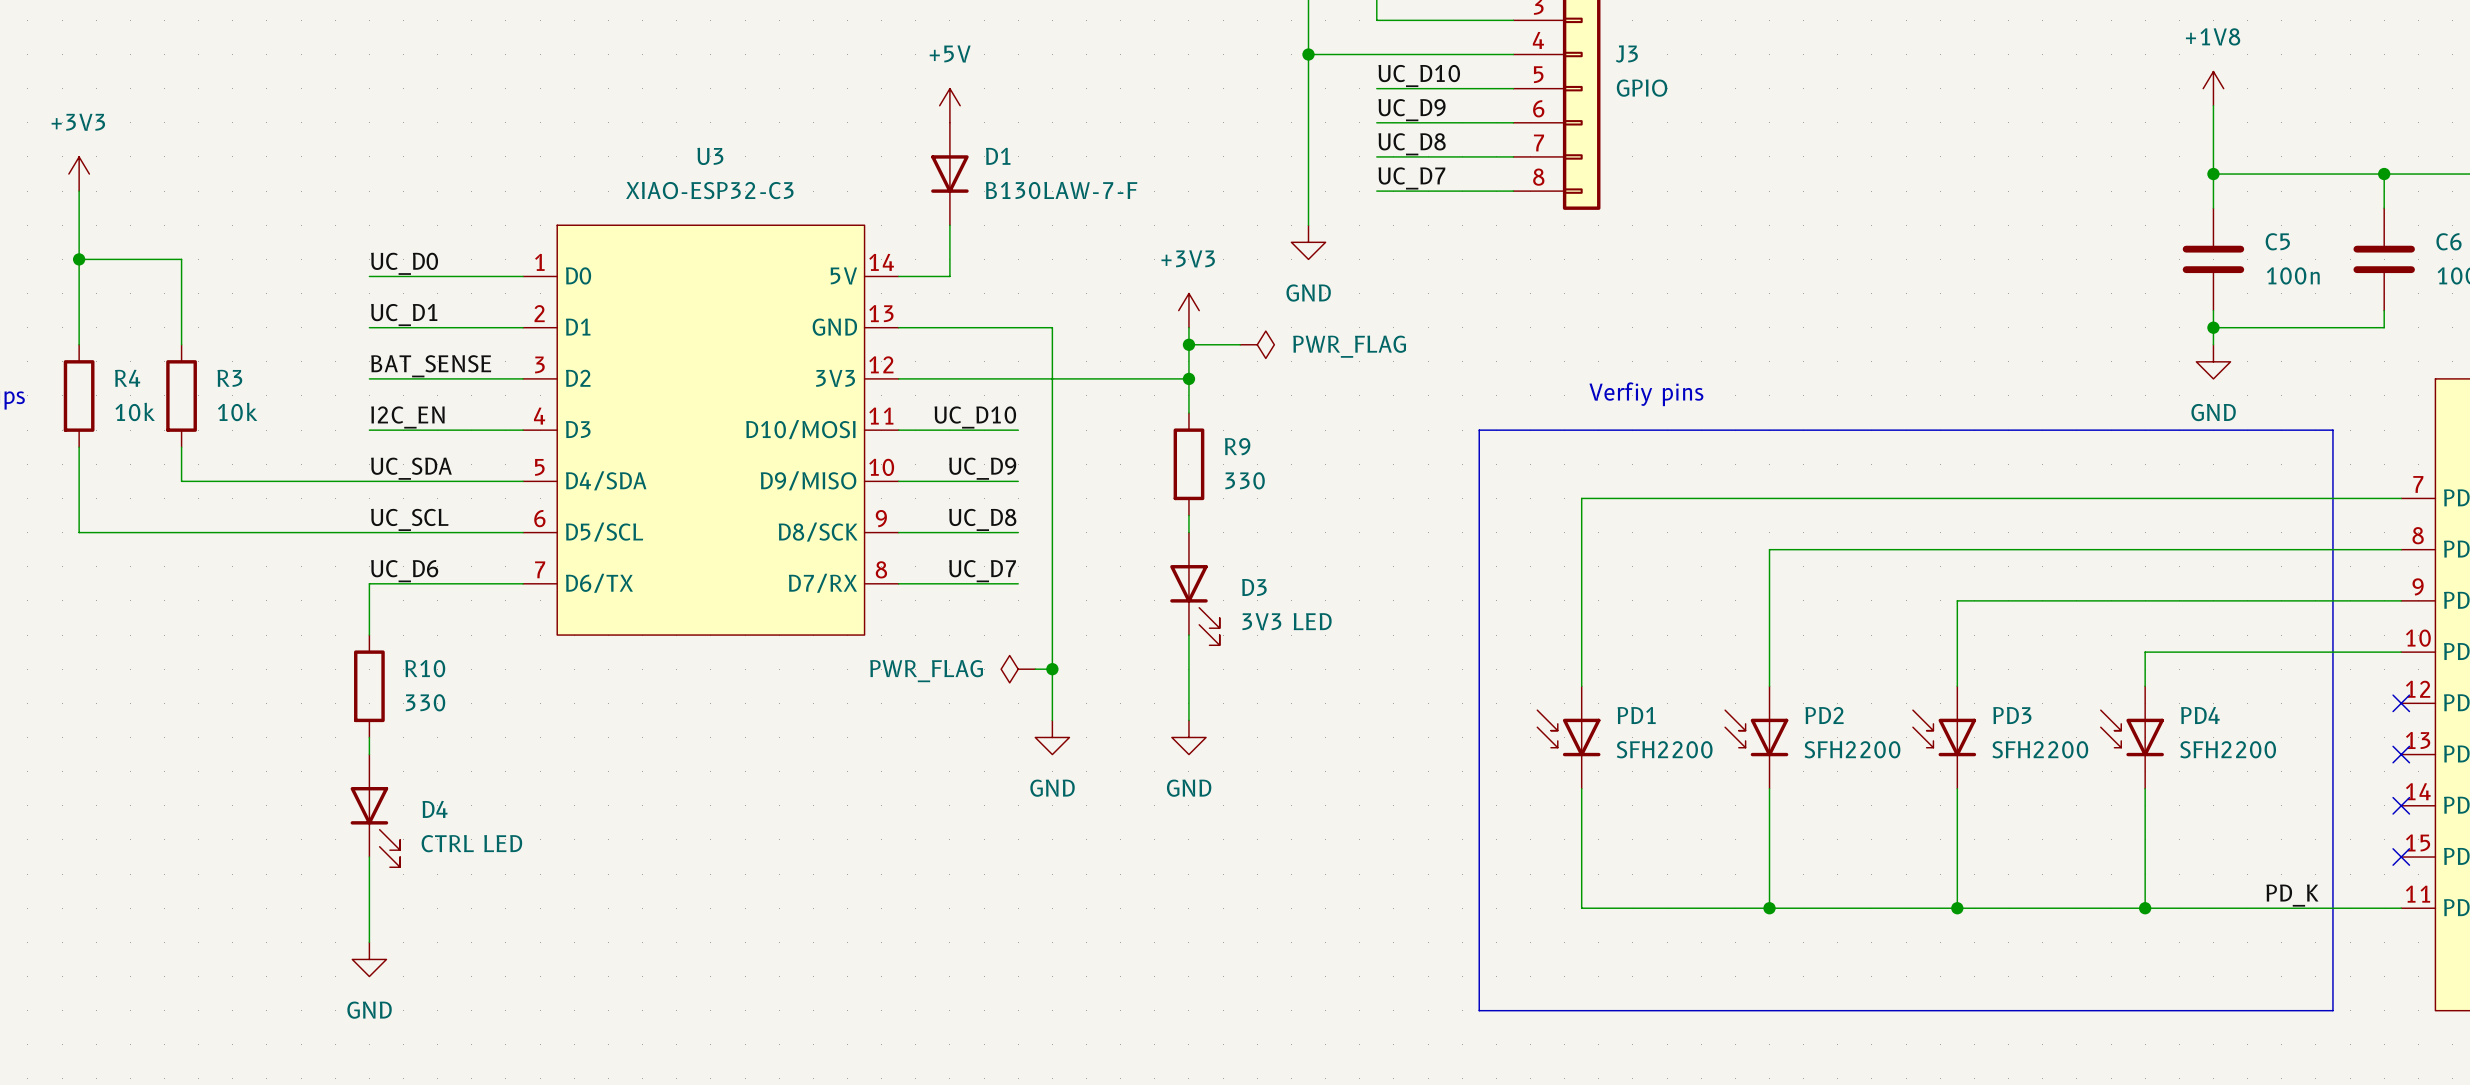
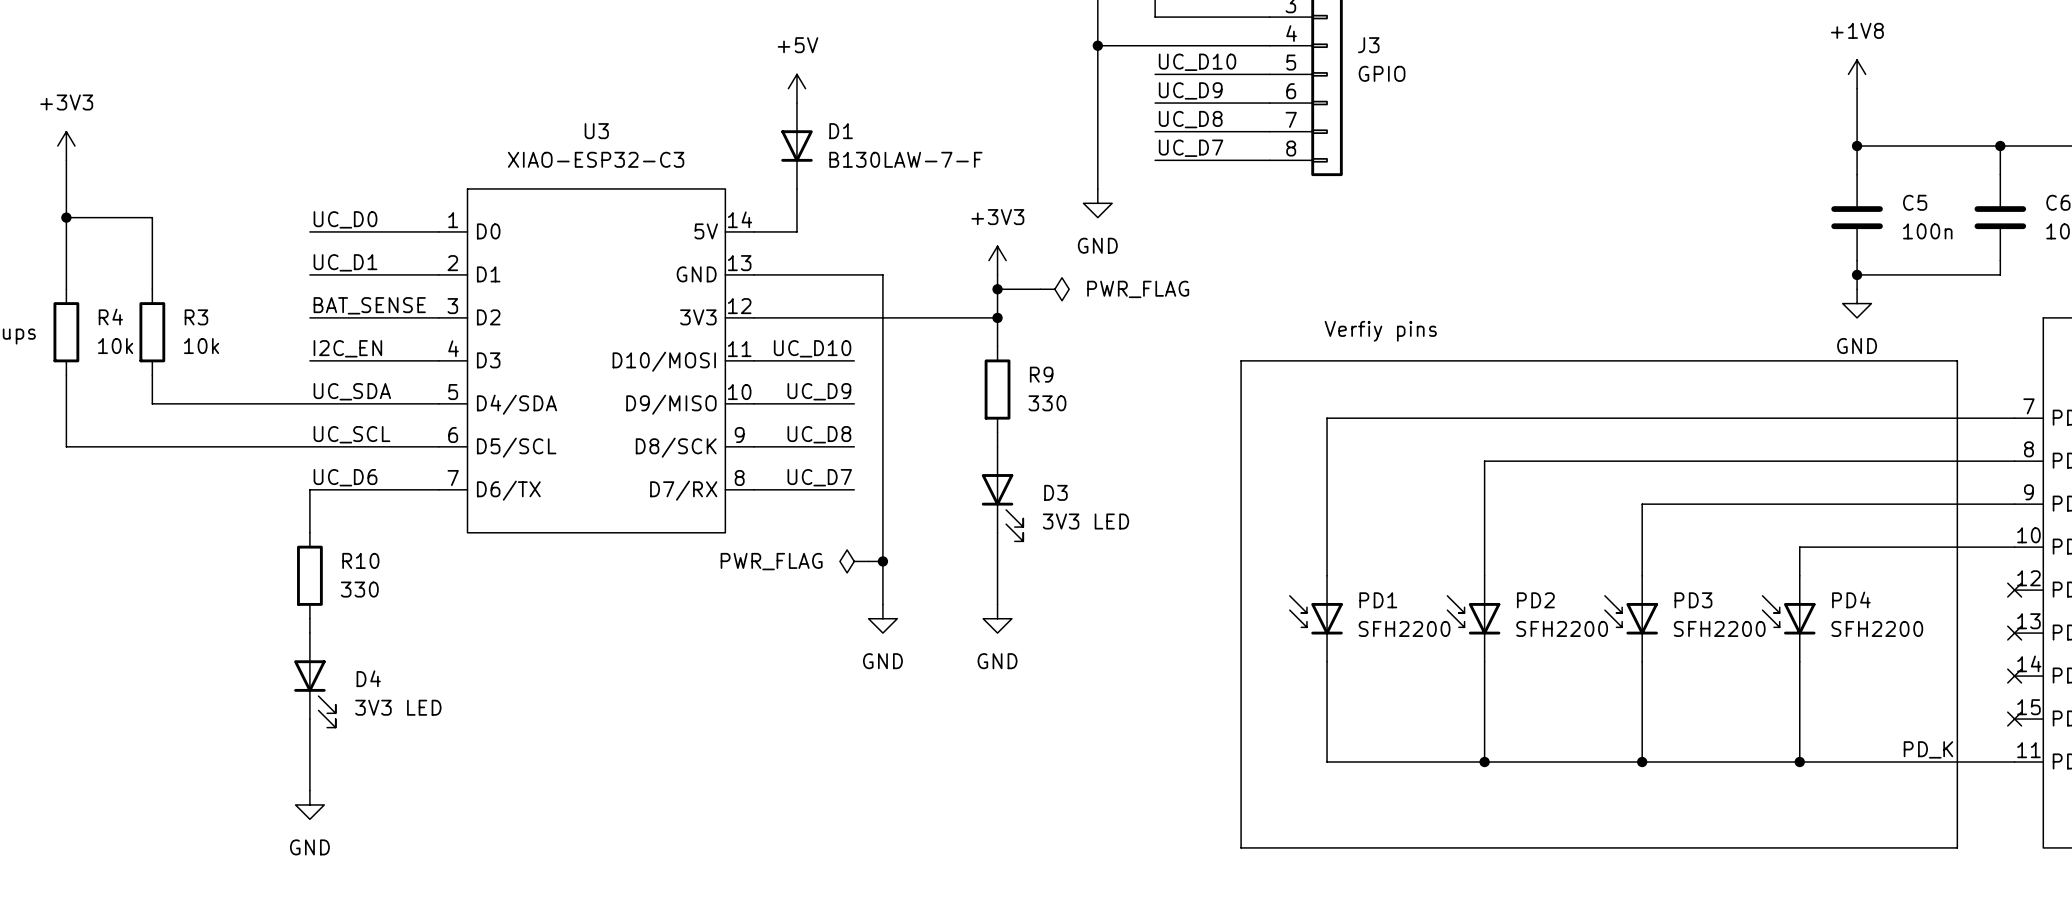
D4 value: CTRL LED (471, 843) -> 3V3 LED (398, 707)

